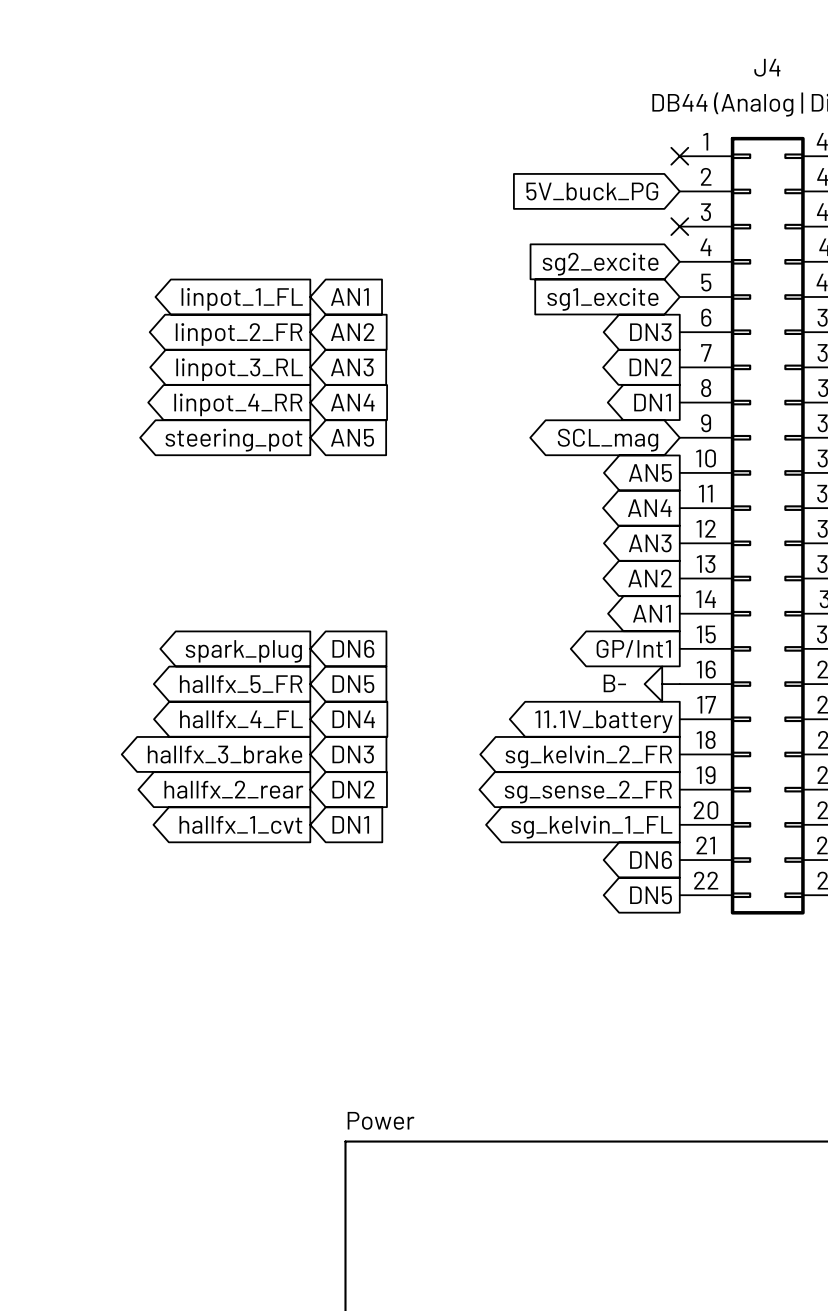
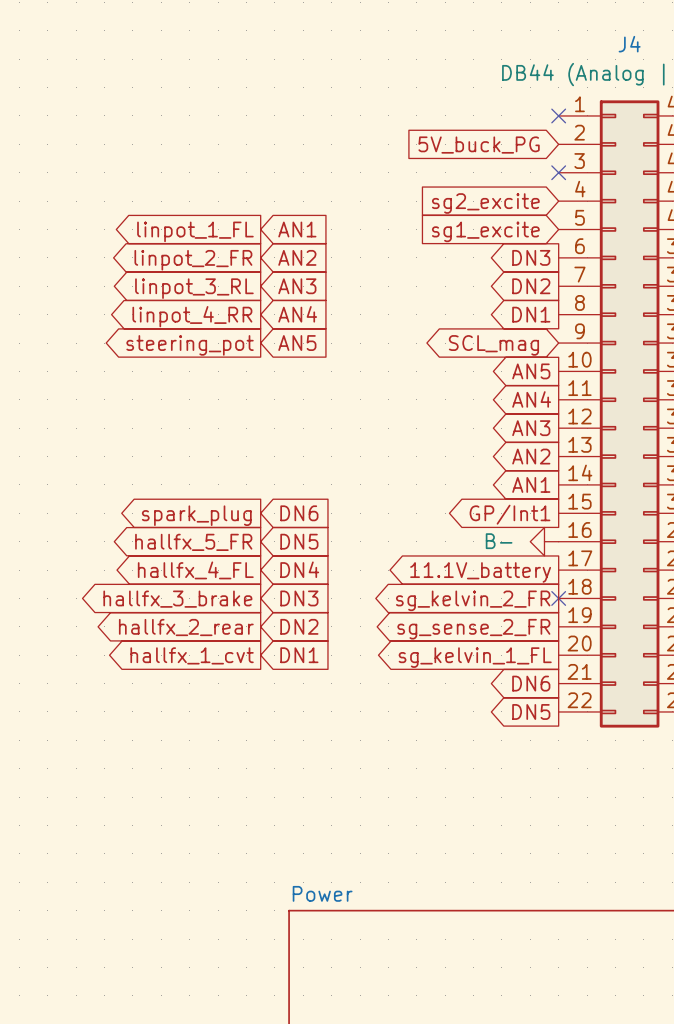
no-connect mark: none -> (558, 598)

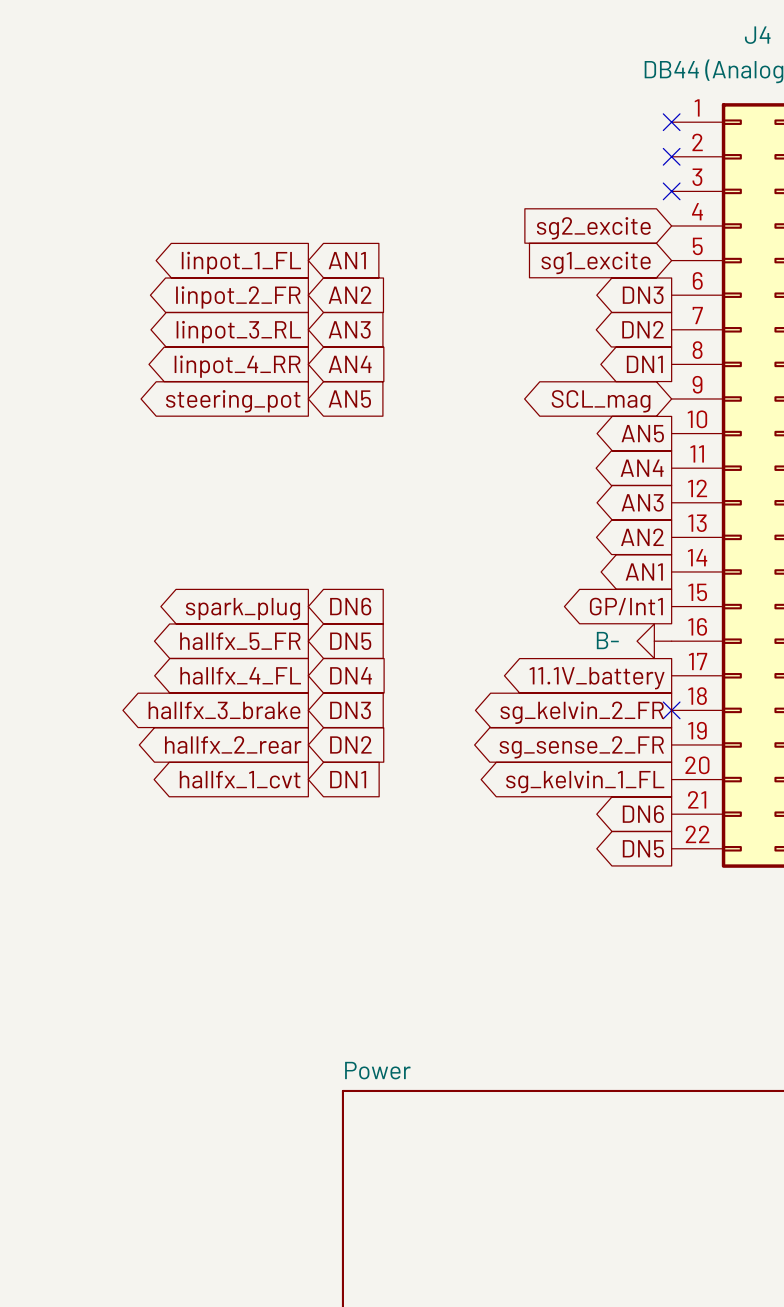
no-connect mark: none -> (671, 156)
global label: 5V_buck_PG (479, 145) -> none

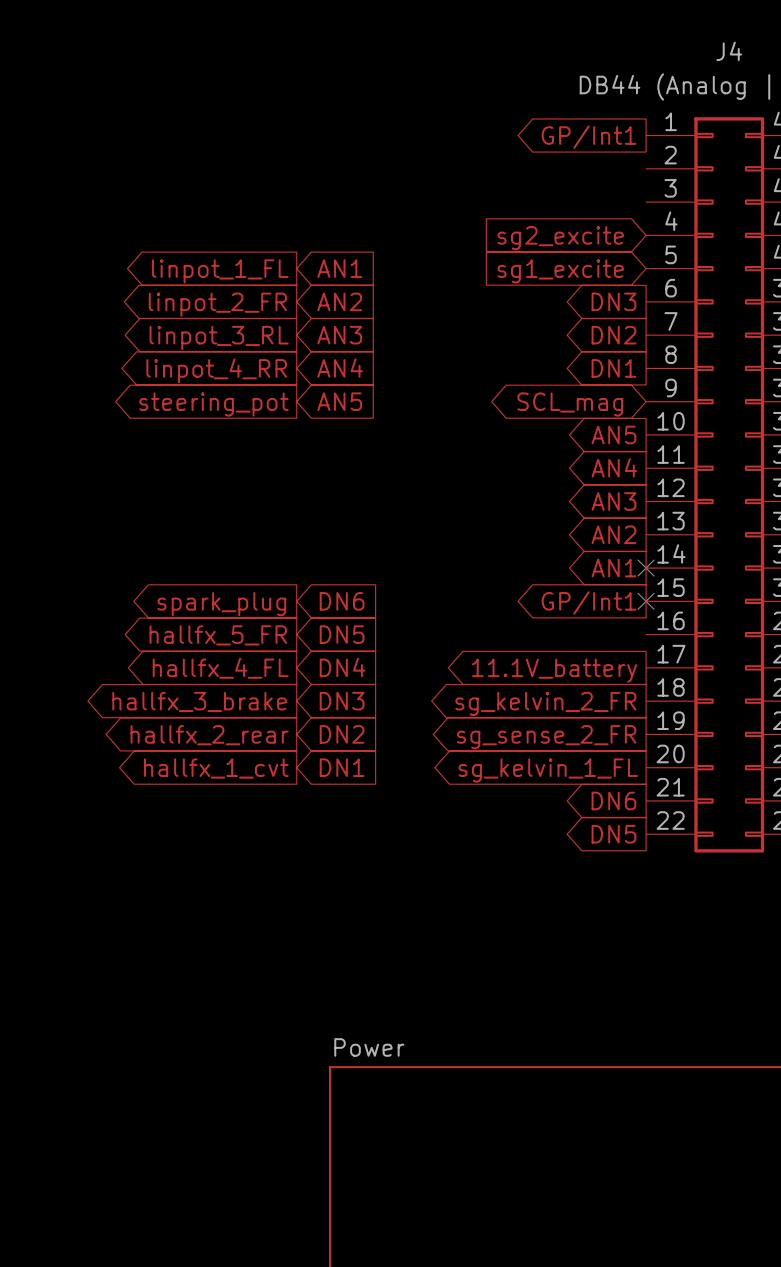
global label: none -> GP/Int1 (589, 137)
no-connect mark: (671, 122) -> none
no-connect mark: (671, 156) -> none
no-connect mark: (671, 191) -> none
no-connect mark: none -> (646, 568)
no-connect mark: none -> (646, 601)
power symbol: B- (654, 641) -> none
no-connect mark: (671, 710) -> none

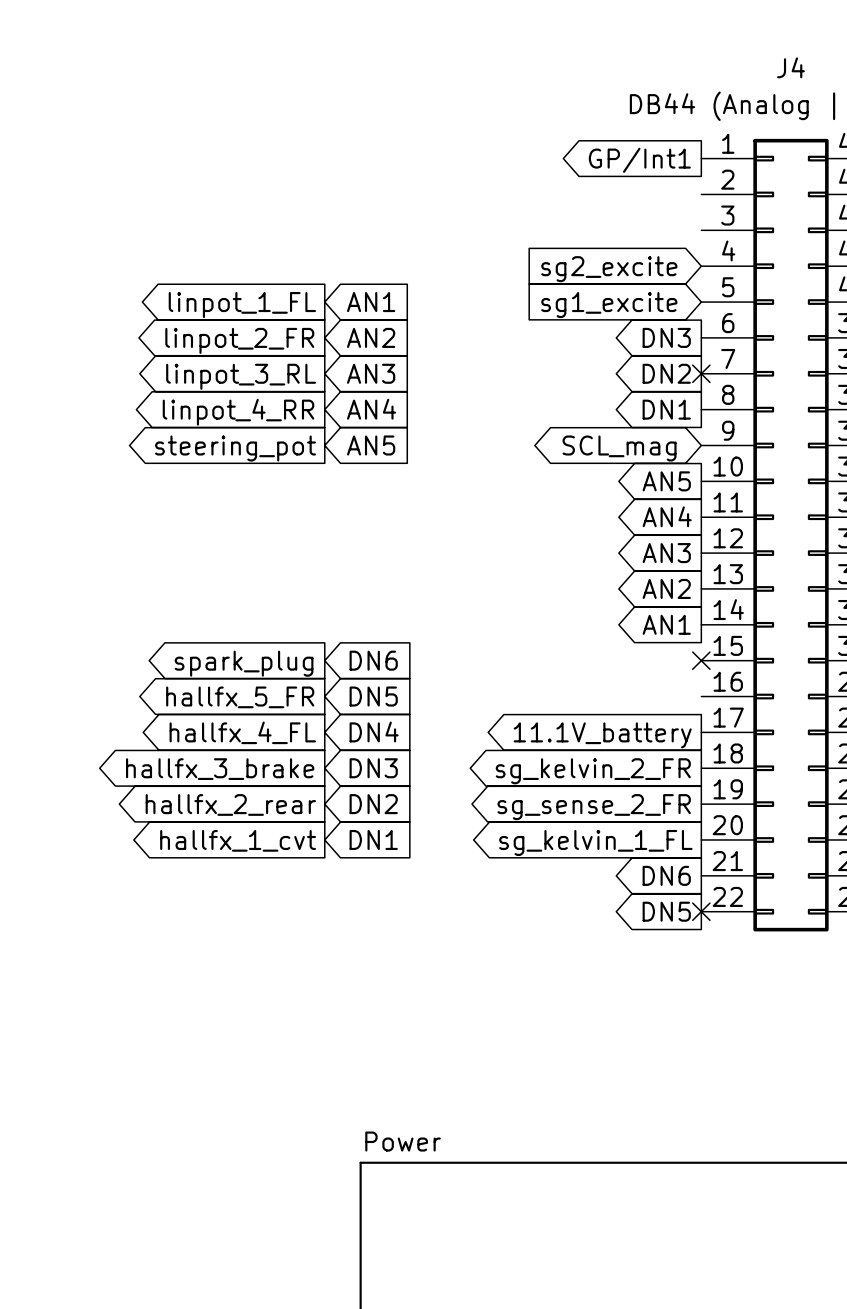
no-connect mark: none -> (701, 373)
no-connect mark: (646, 568) -> none
global label: GP/Int1 (589, 602) -> none
no-connect mark: none -> (701, 911)

